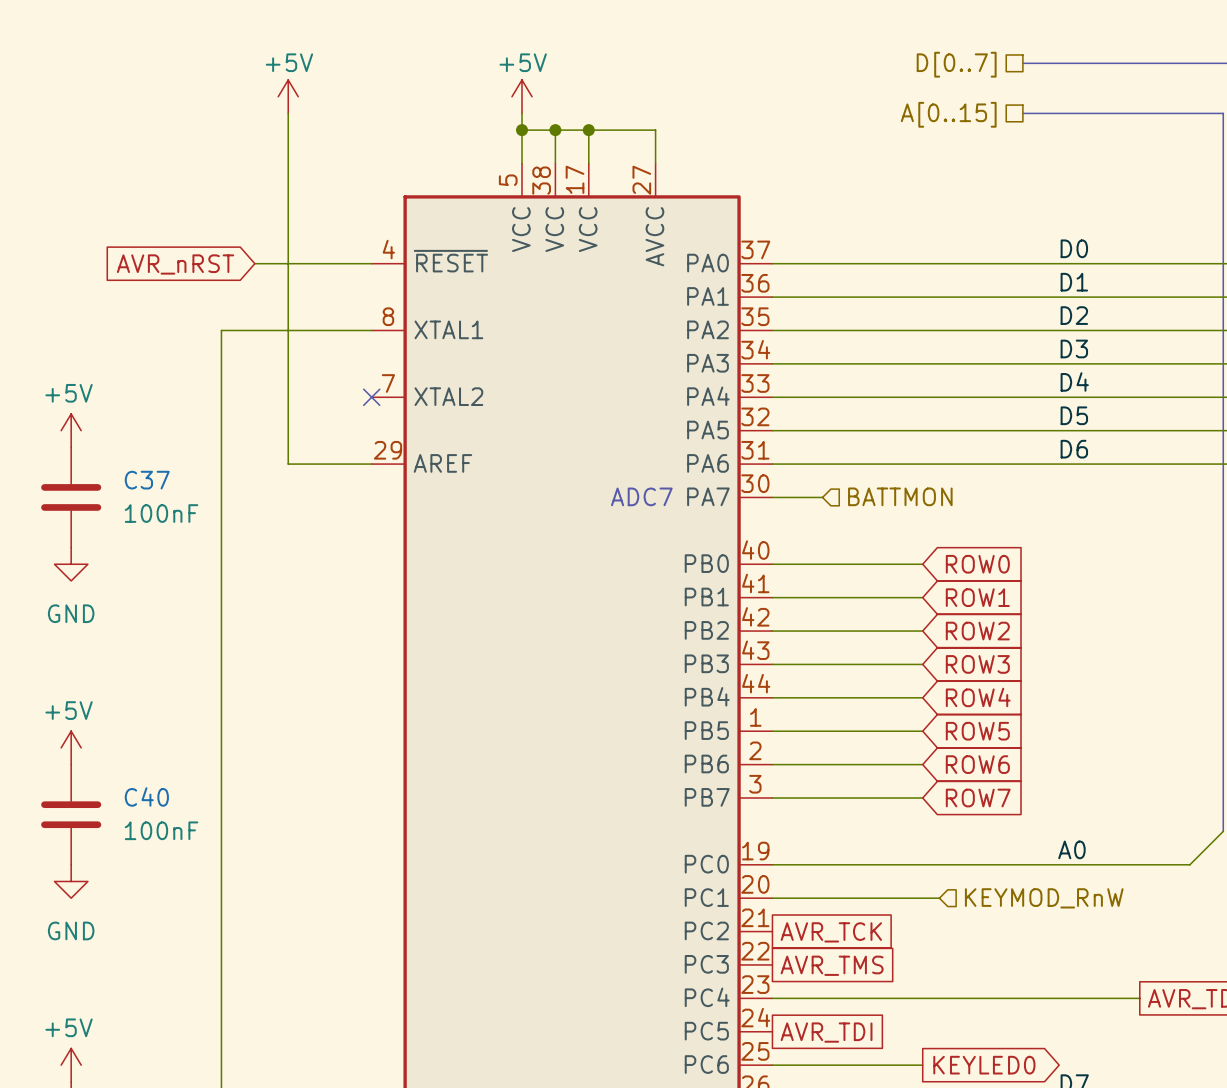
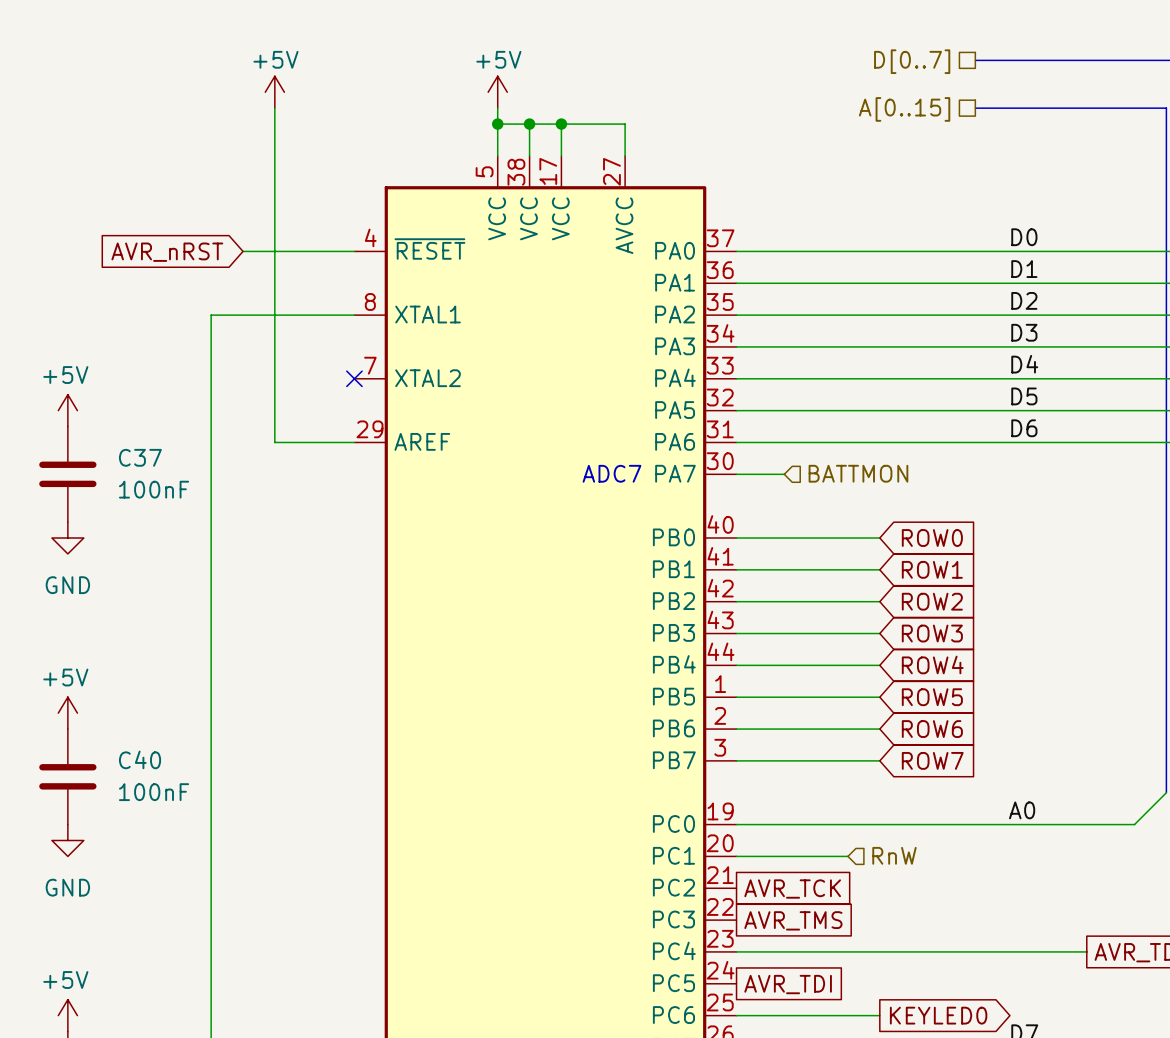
hierarchical label: none -> RnW (894, 855)
wire: (889, 898) (939, 898) -> none
hierarchical label: KEYMOD_RnW (1044, 898) -> none

